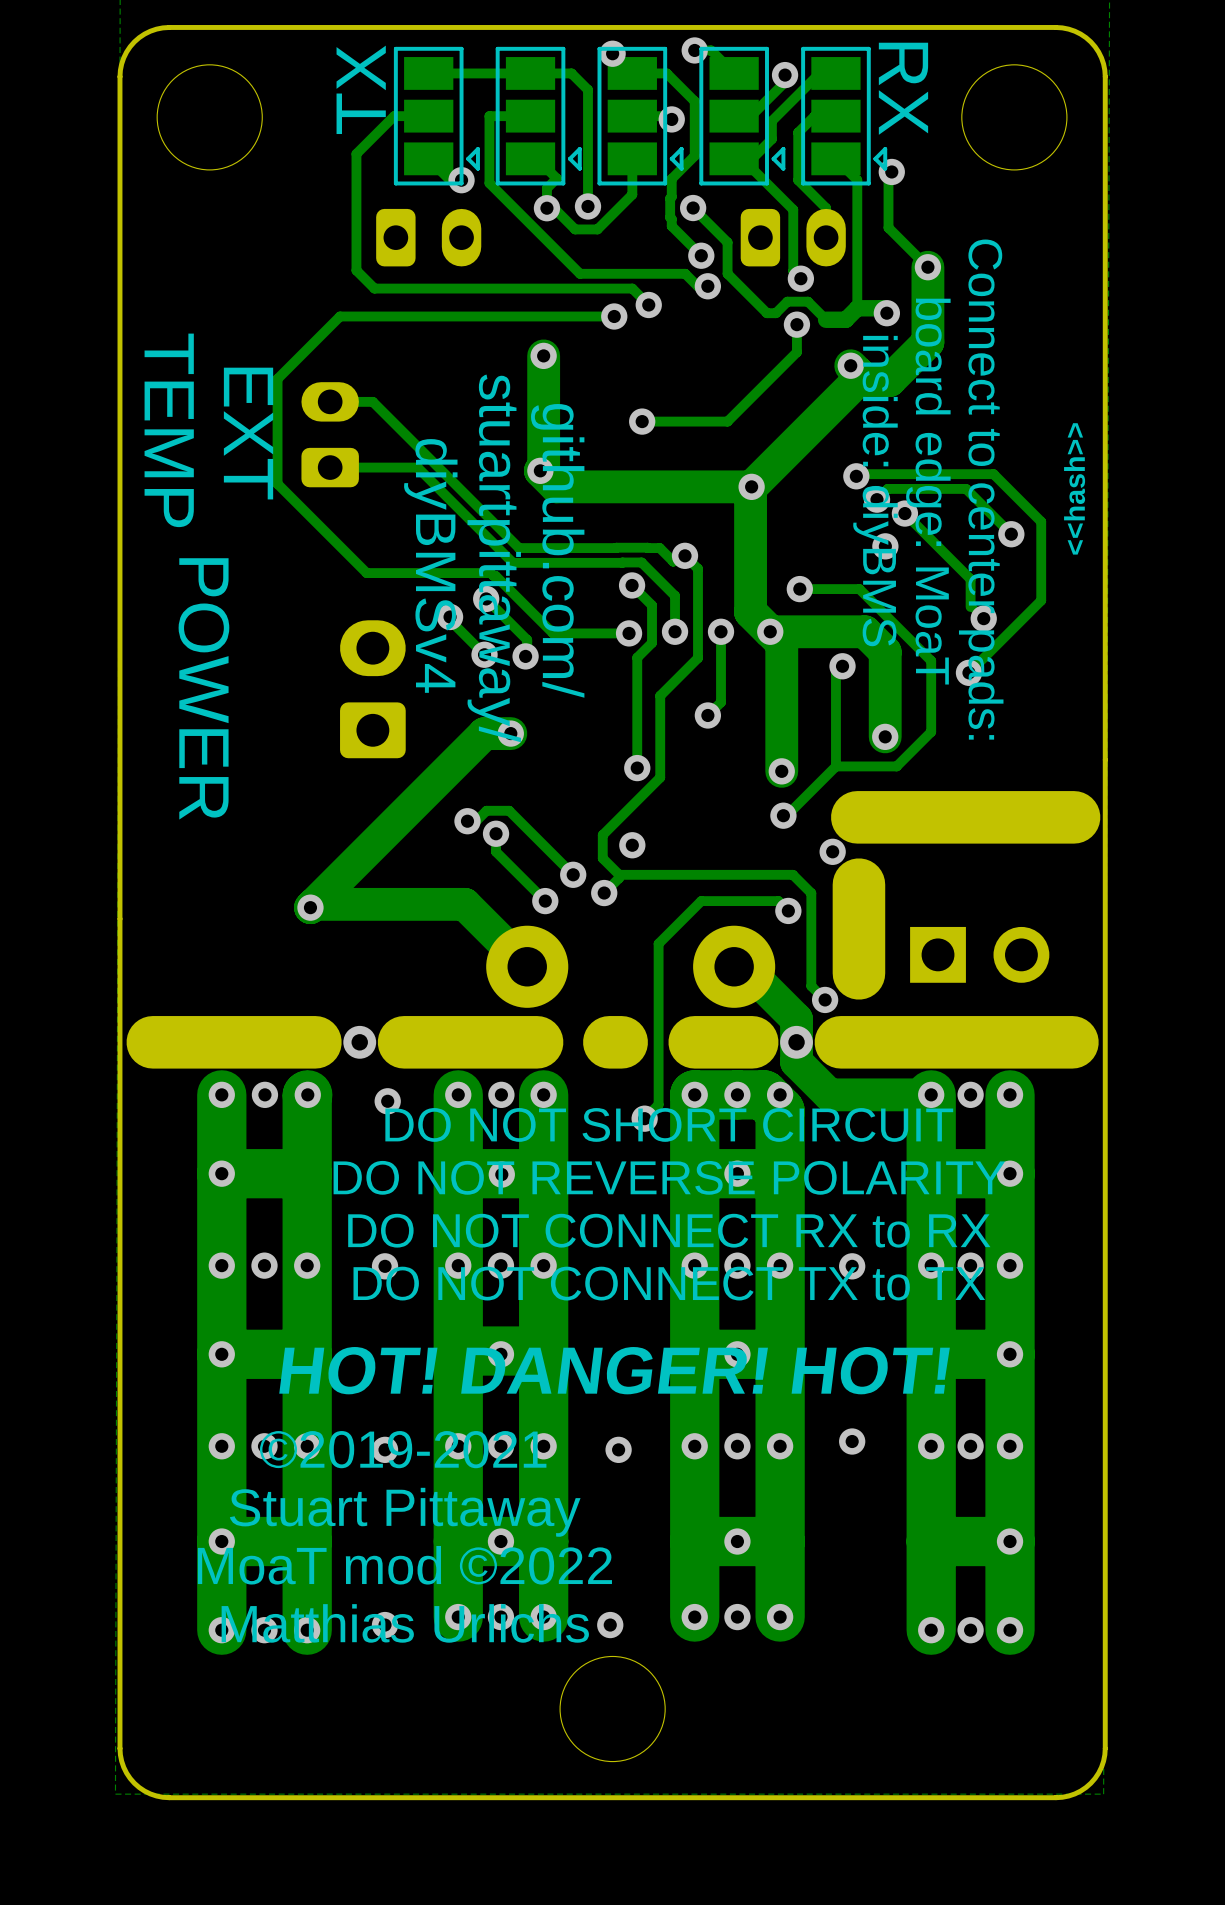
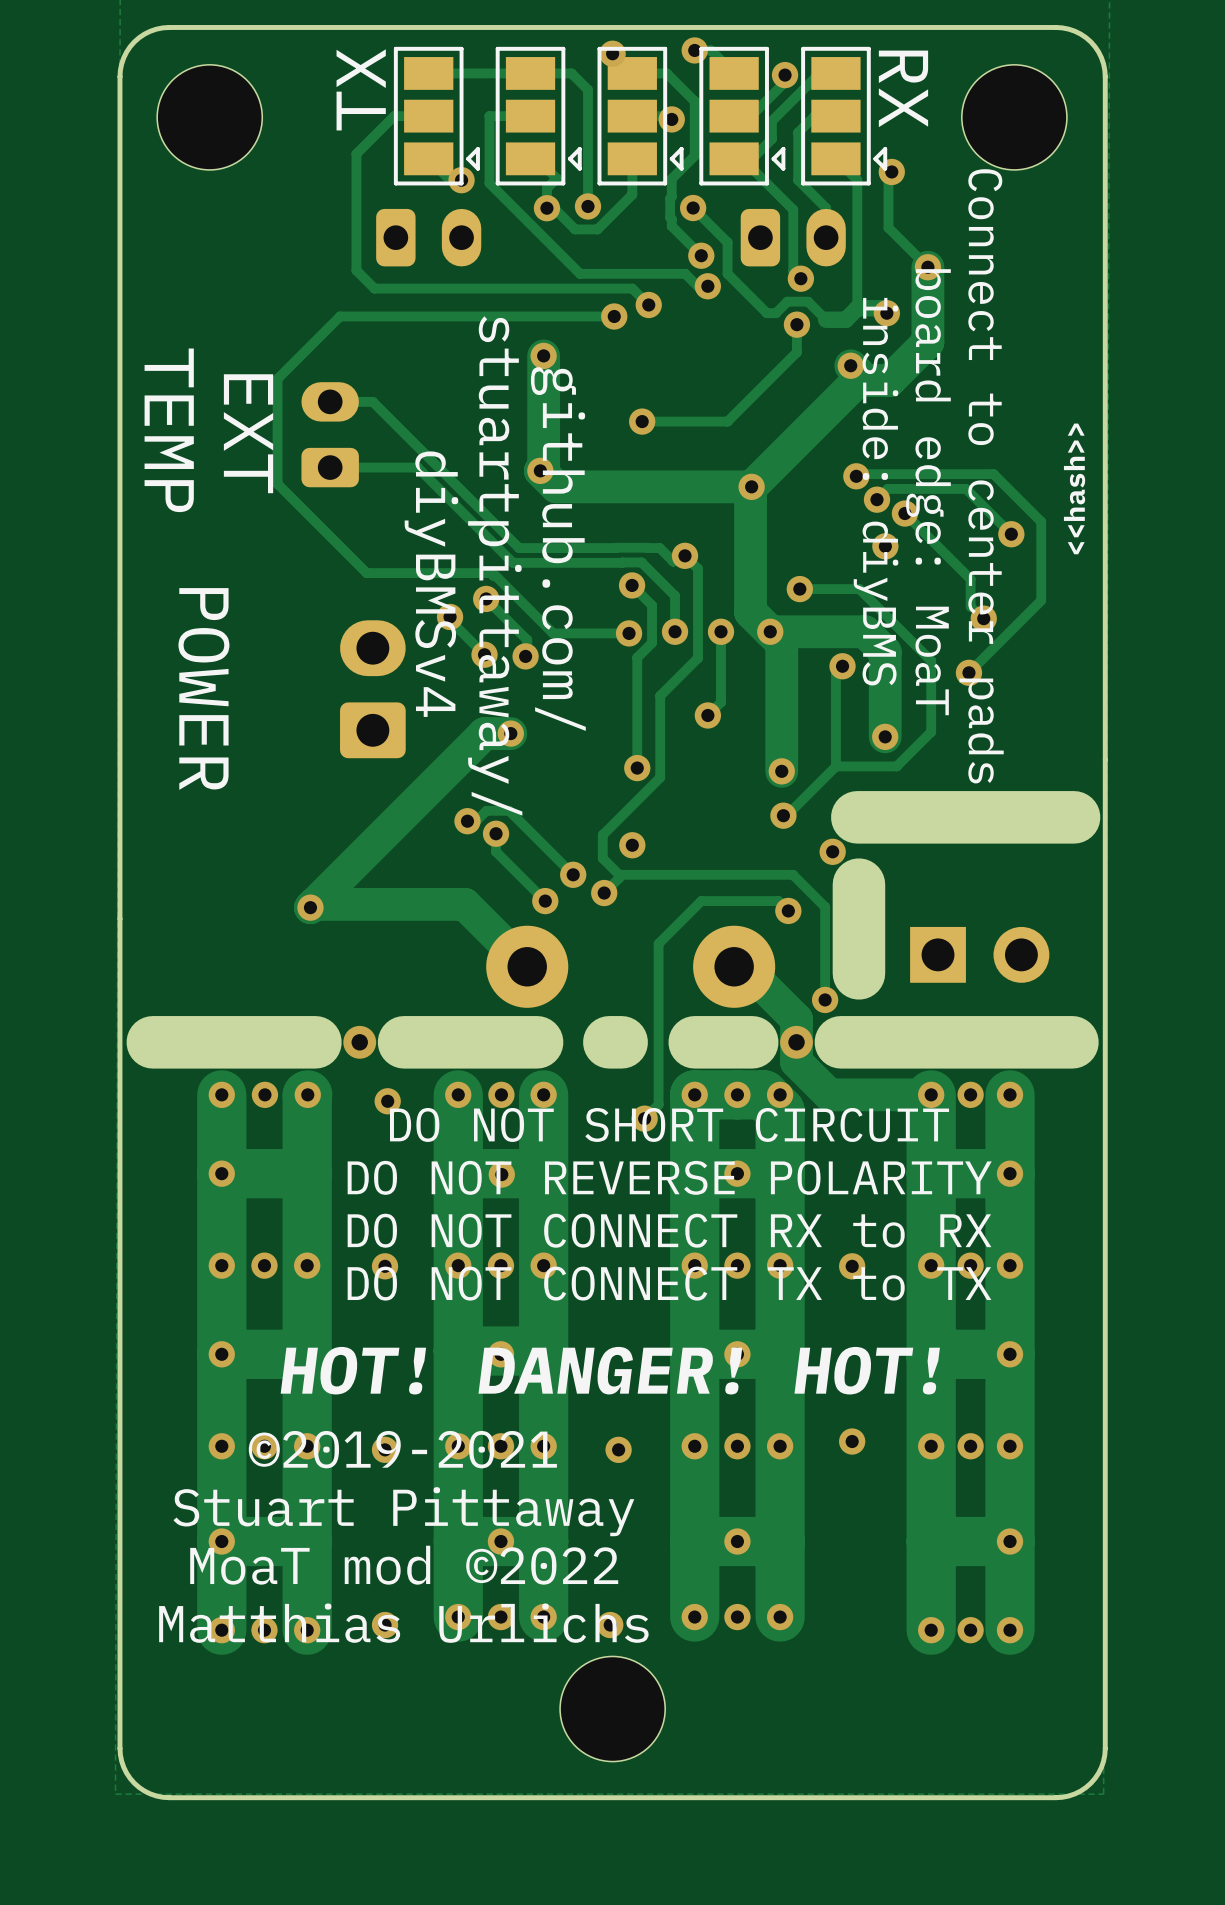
track: (811, 893) (811, 986) (825, 999) -> (811, 893) (825, 907) (825, 999)

